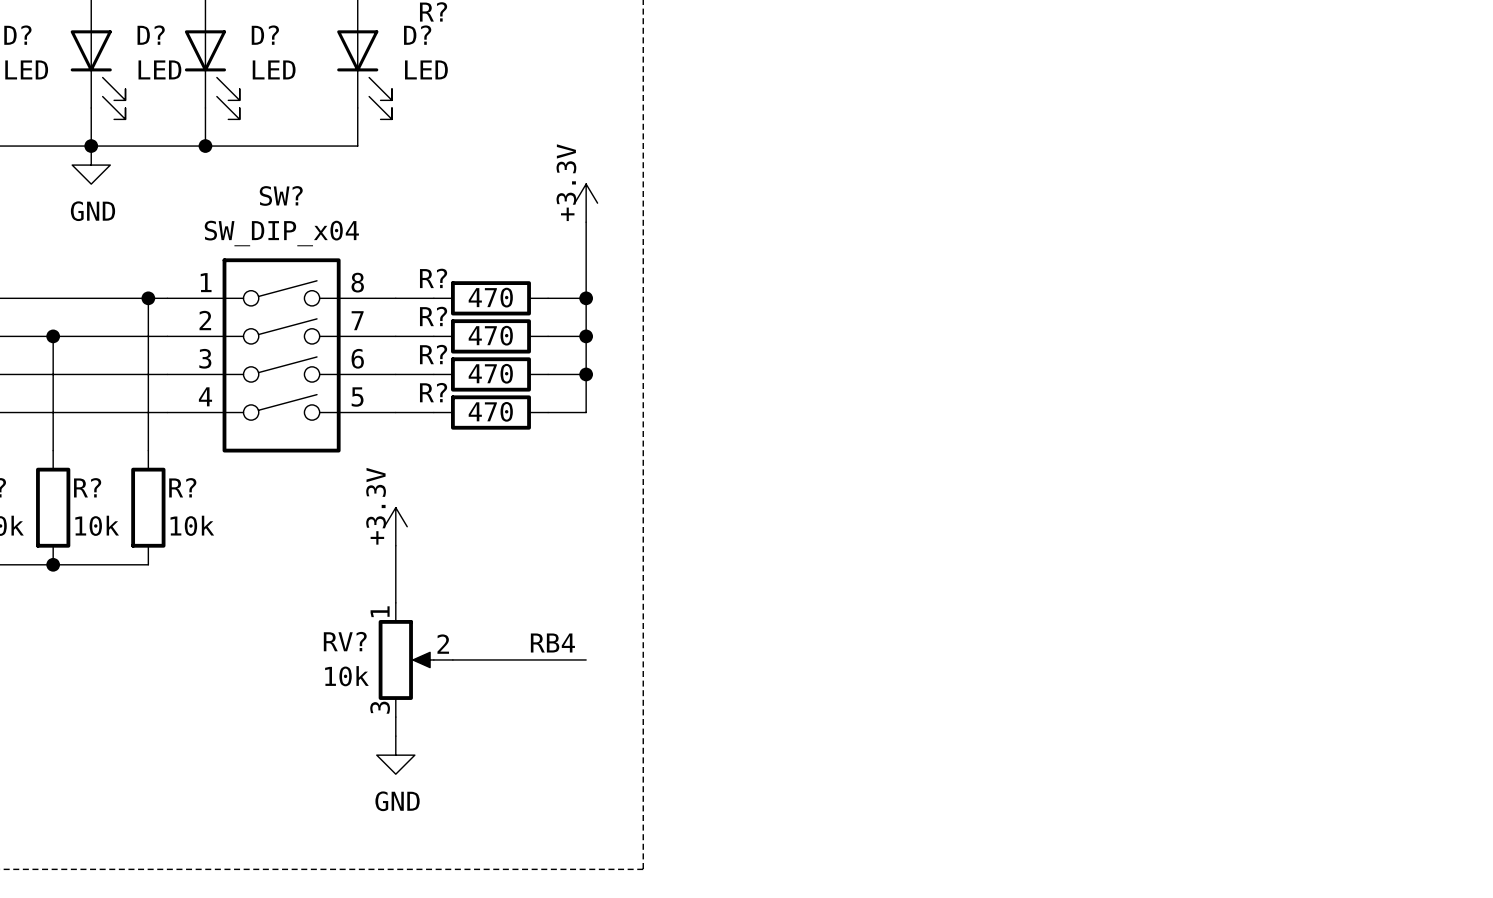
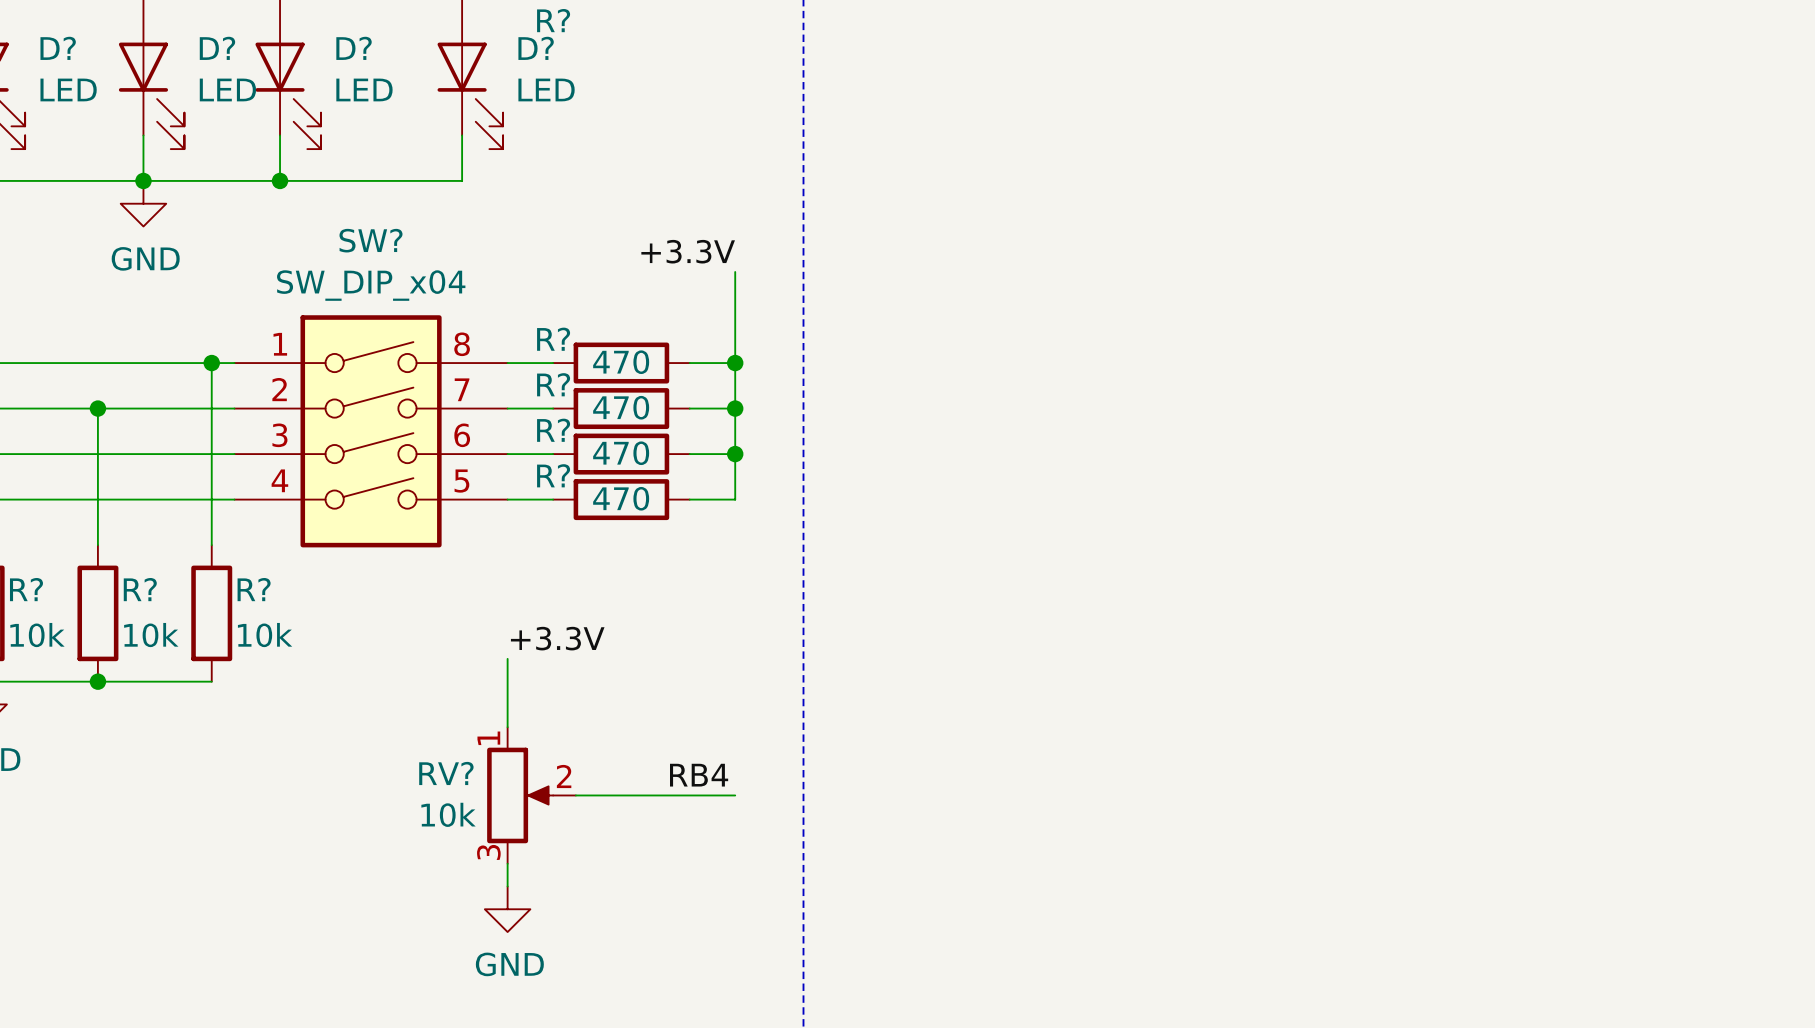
power symbol: +3.3V (586, 203) -> none
label: none -> +3.3V (688, 251)
power symbol: +3.3V (395, 526) -> none
label: none -> +3.3V (557, 638)

